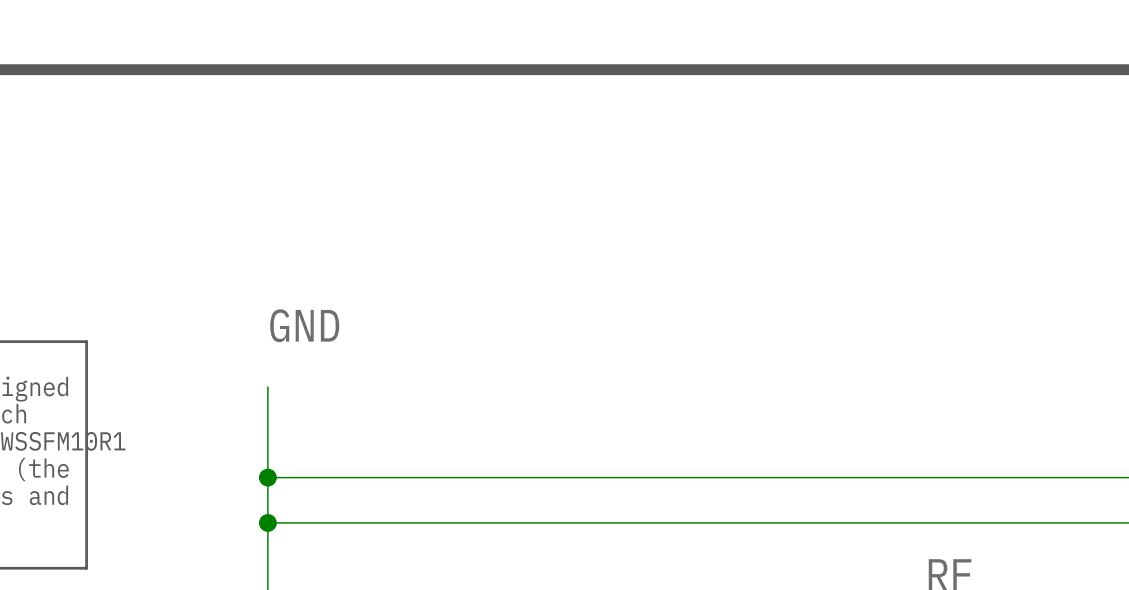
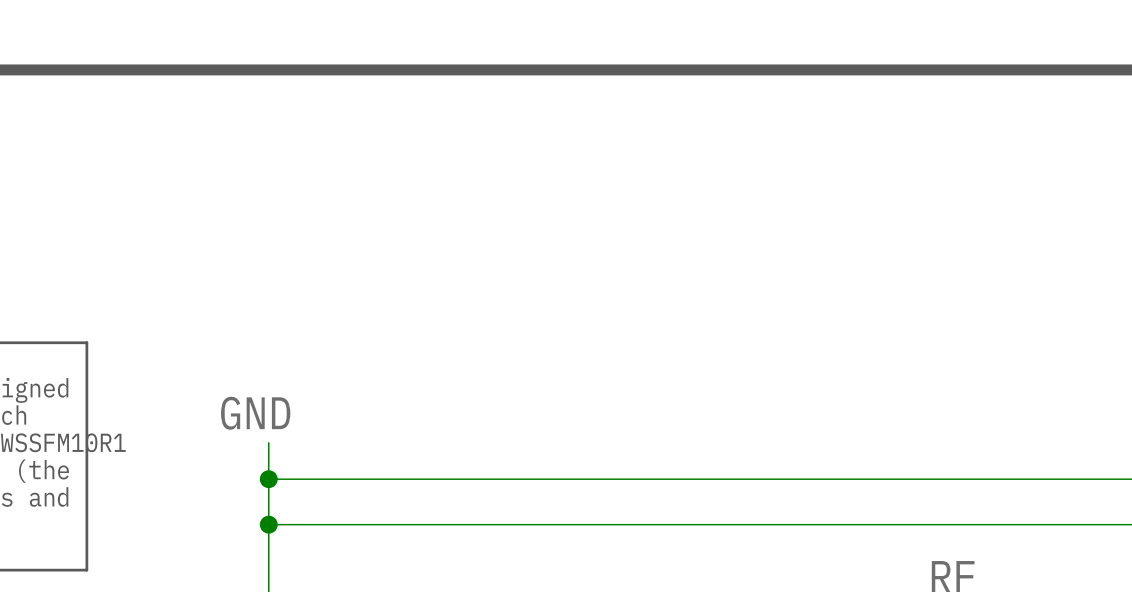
label position: GND (304, 325) -> GND (255, 413)
wire: (267, 386) (267, 441) -> none

